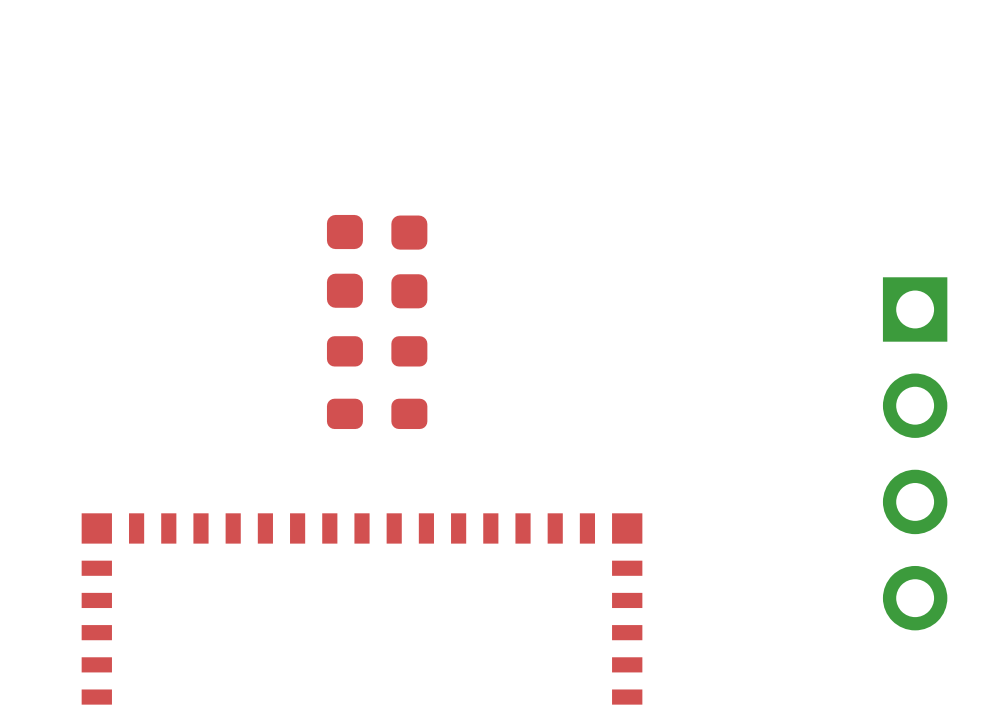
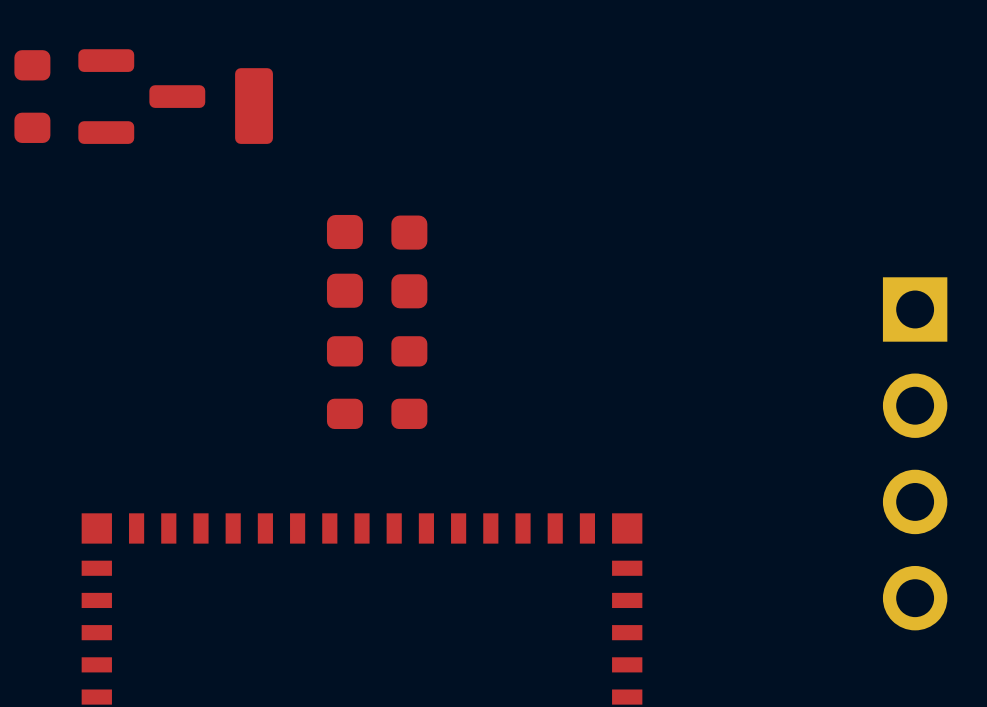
part: none -> (32, 96)
part: none -> (141, 96)
part: none -> (254, 106)

